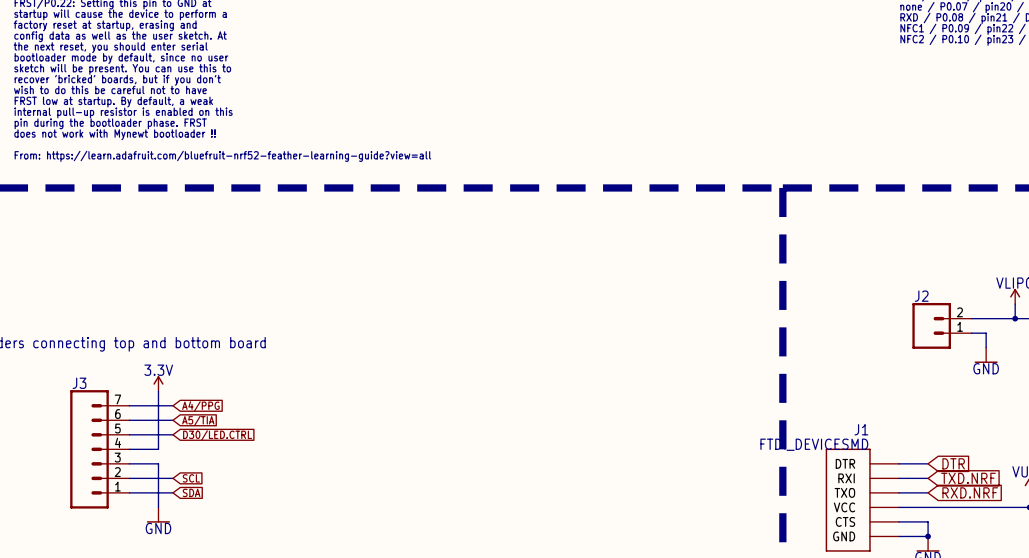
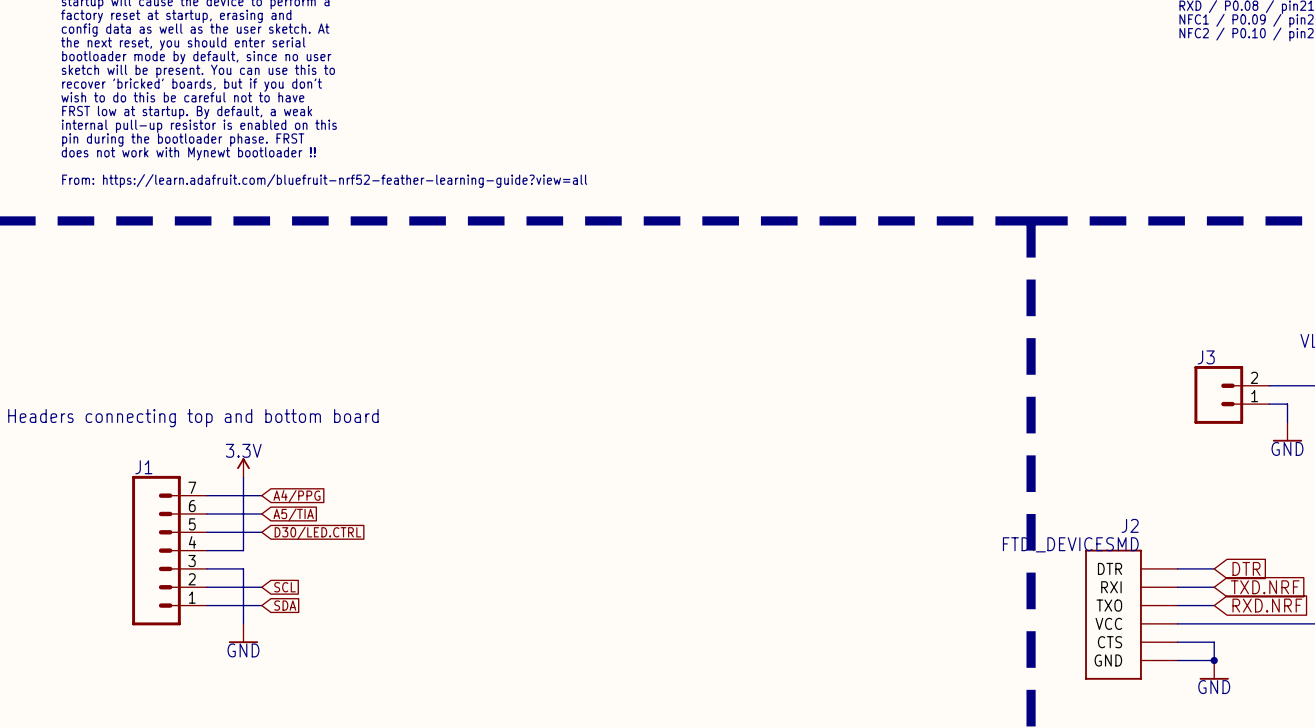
J2 name: J2 (921, 296) -> J3 (1206, 357)
J3 name: J3 (79, 383) -> J1 (143, 467)
J1 name: J1 (861, 429) -> J2 (1130, 525)

